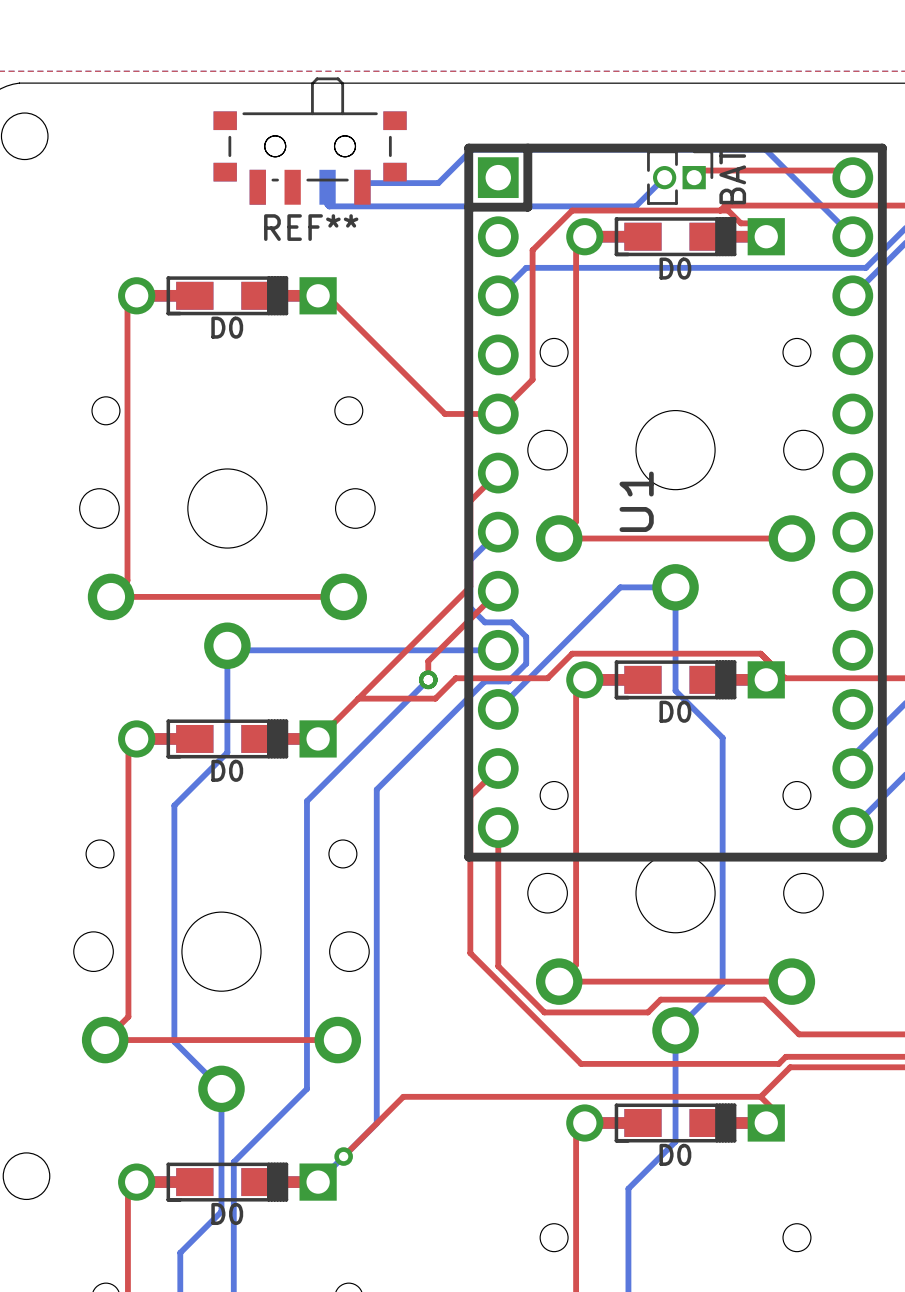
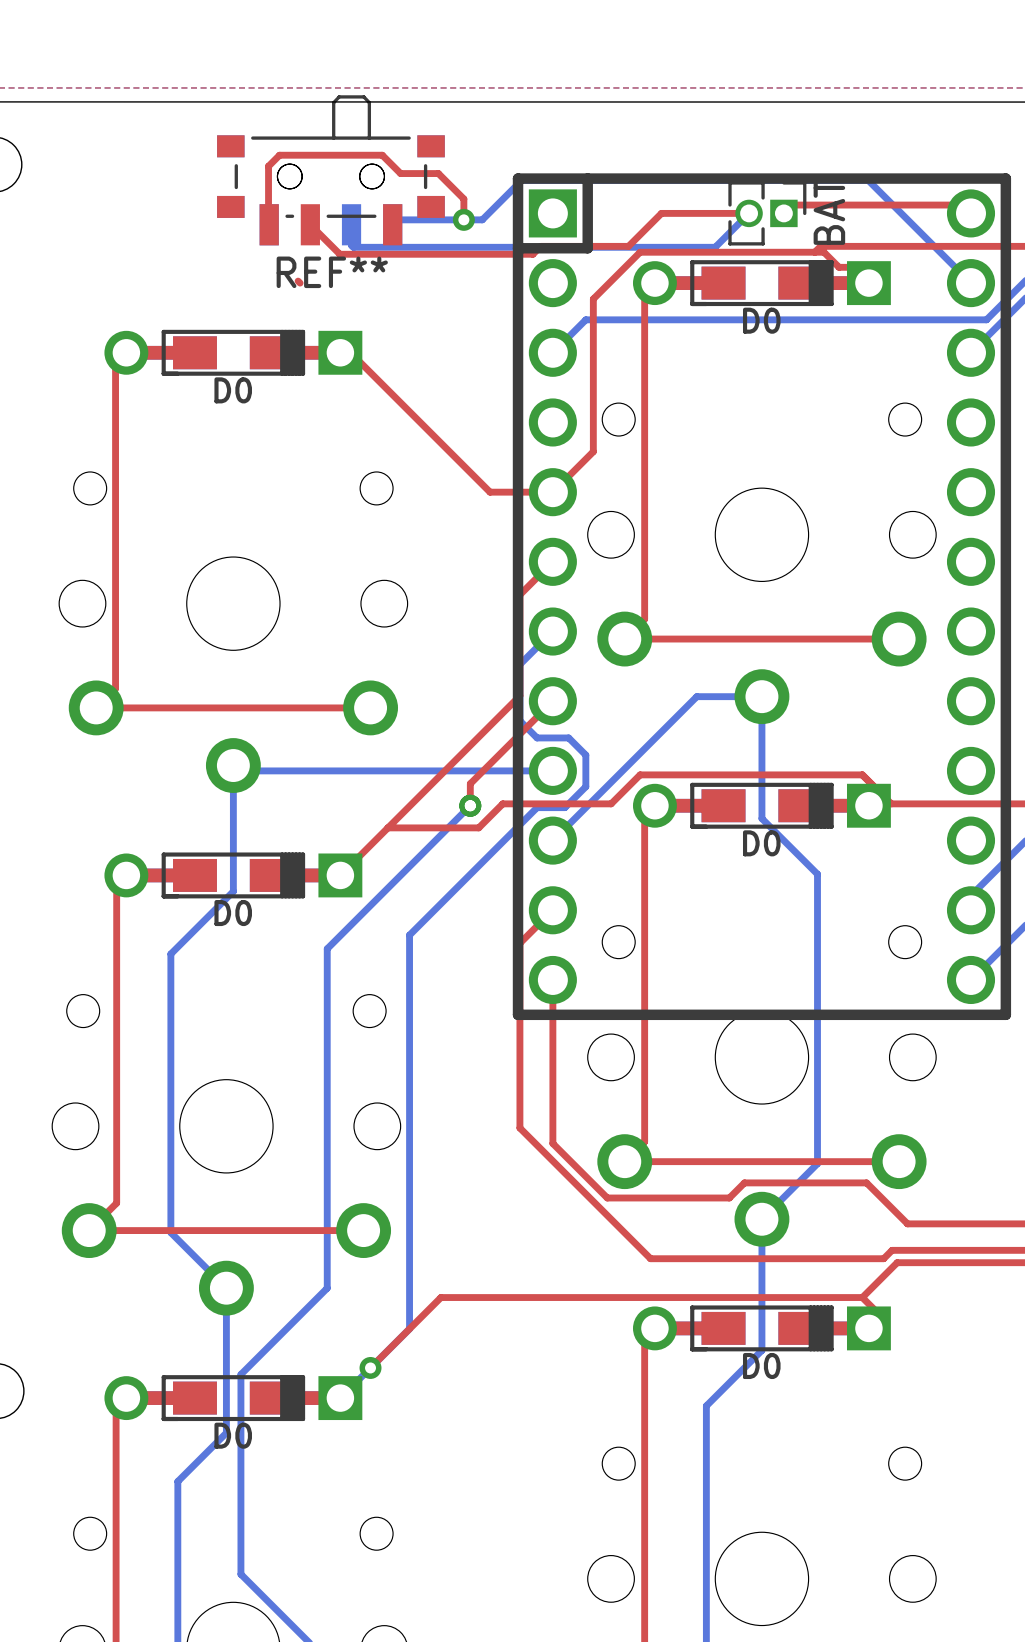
top track: none -> (749, 213) (661, 213) (628, 246) (540, 246) (532, 254) (339, 254) (310, 224)
top track: none -> (463, 219) (463, 198) (438, 173) (400, 173) (382, 155) (279, 155) (268, 166) (269, 224)
via: none -> (463, 219)
top track: none -> (298, 281) (300, 283)
U1 name: U1 (636, 501) -> none

